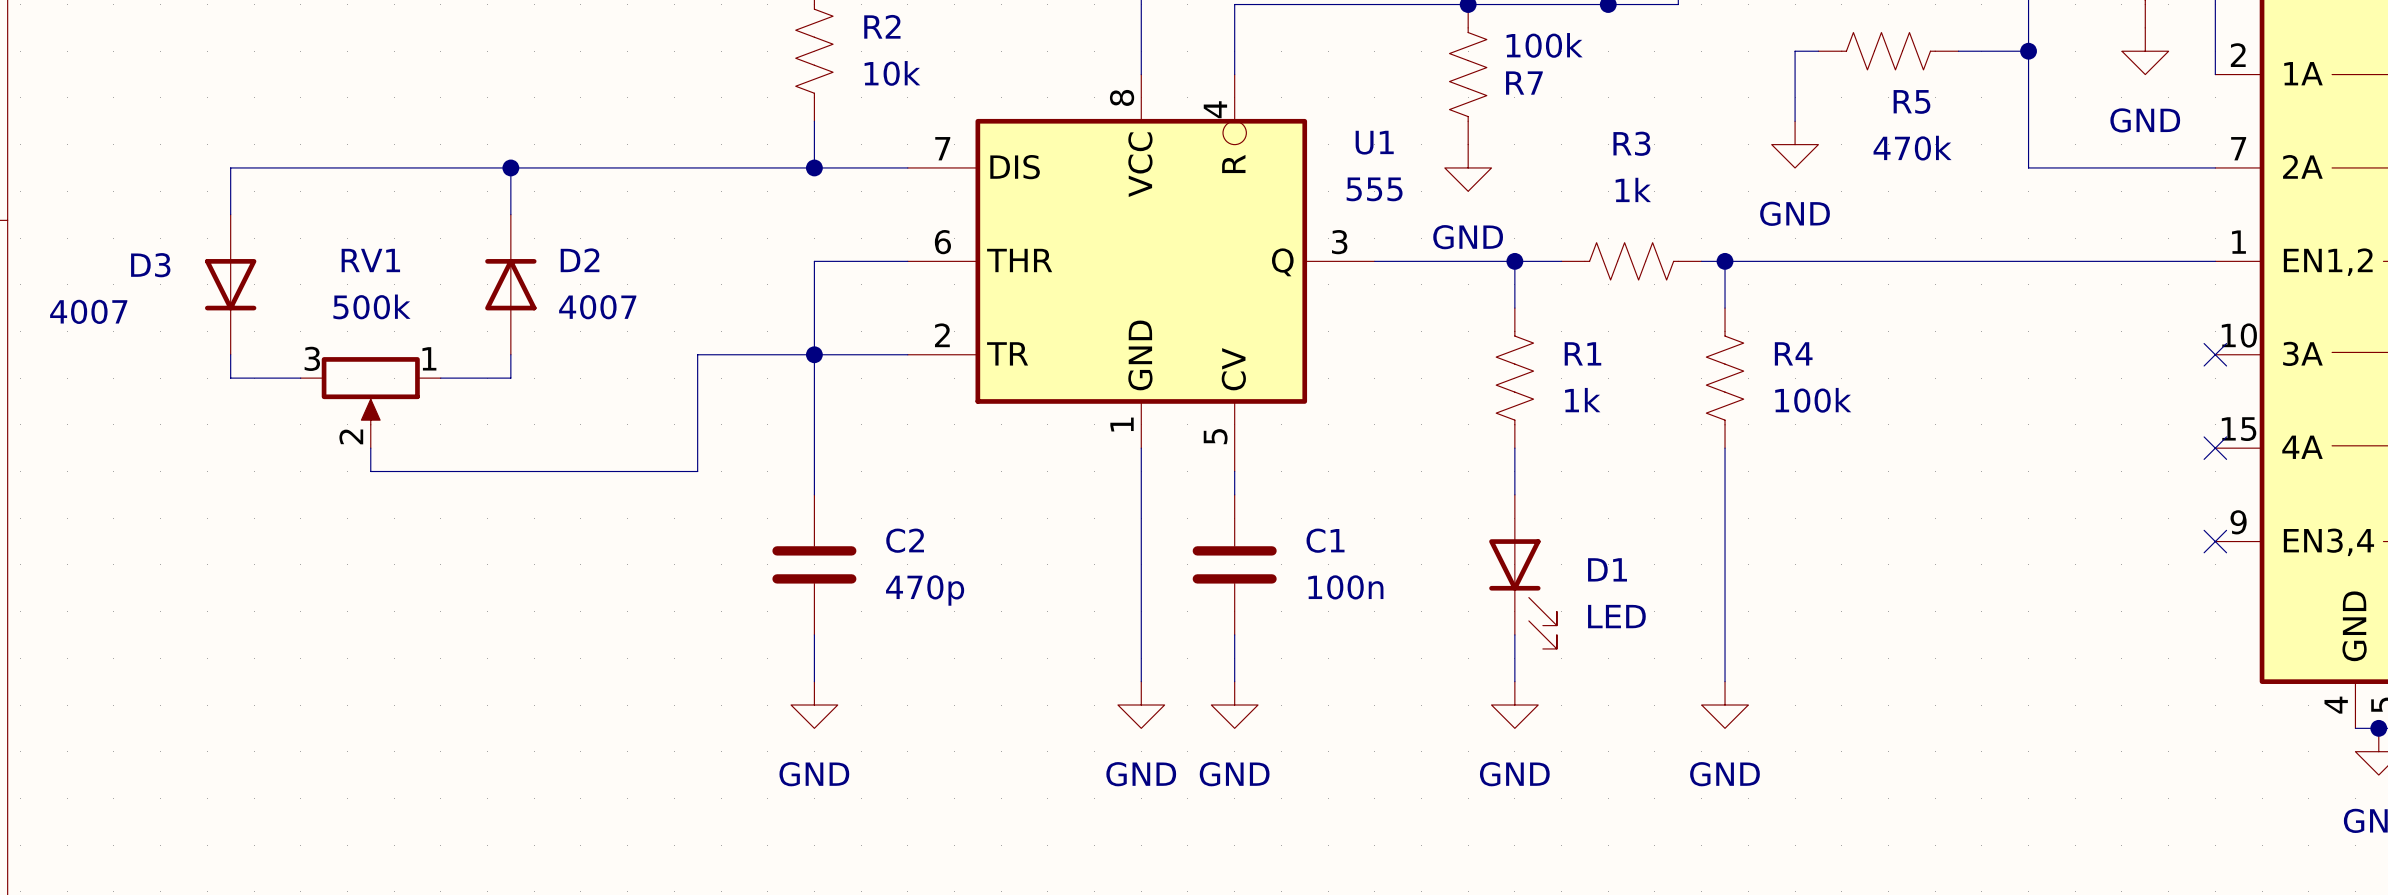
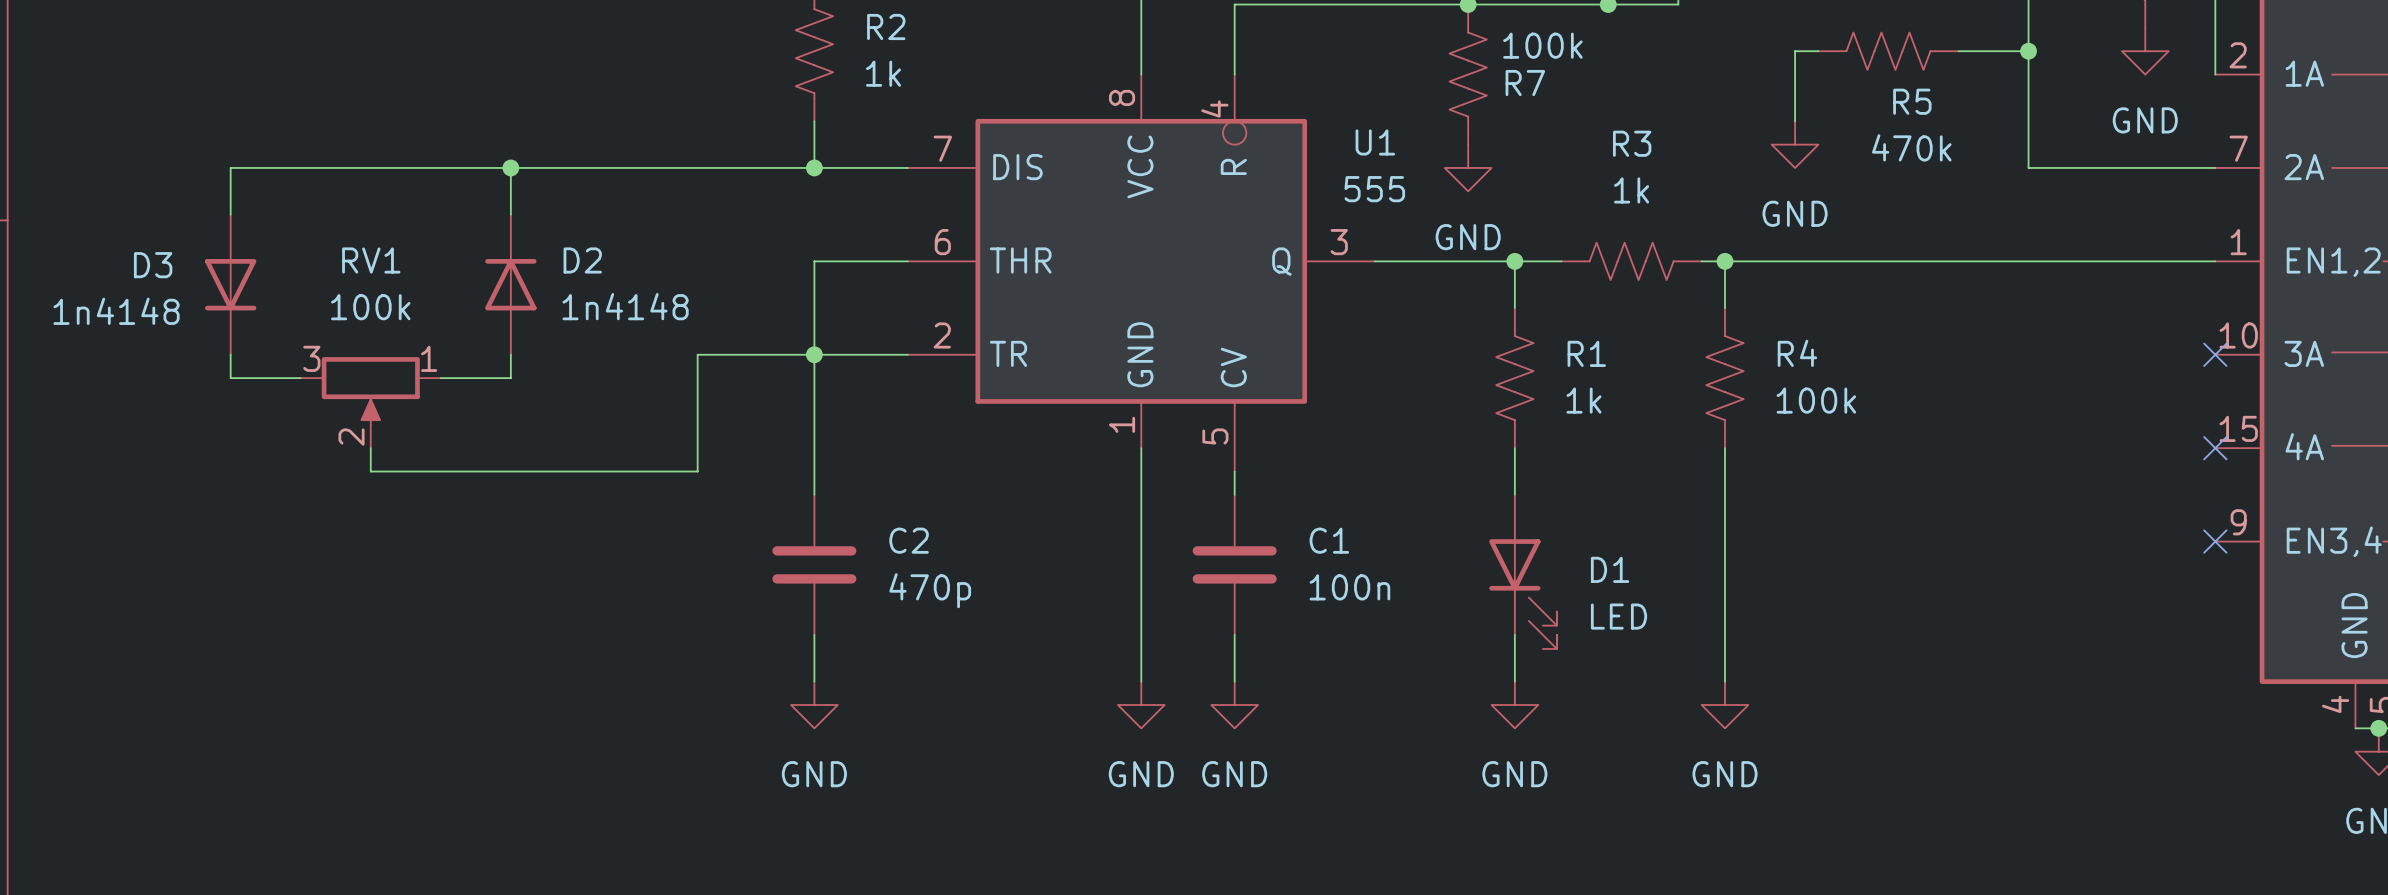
R2 value: 10k (892, 73) -> 1k (883, 73)
RV1 value: 500k (371, 306) -> 100k (370, 307)
D2 value: 4007 (597, 307) -> 1n4148 (625, 306)
D3 value: 4007 (88, 311) -> 1n4148 (116, 311)

